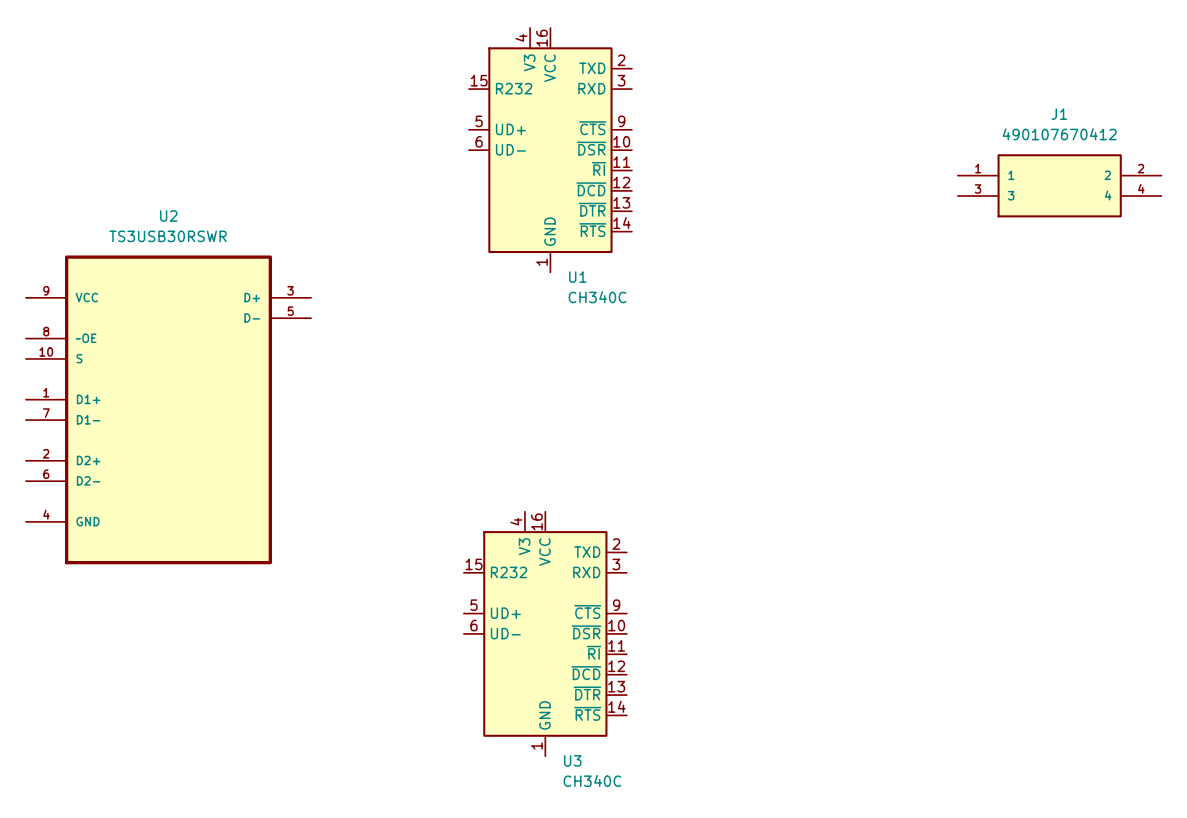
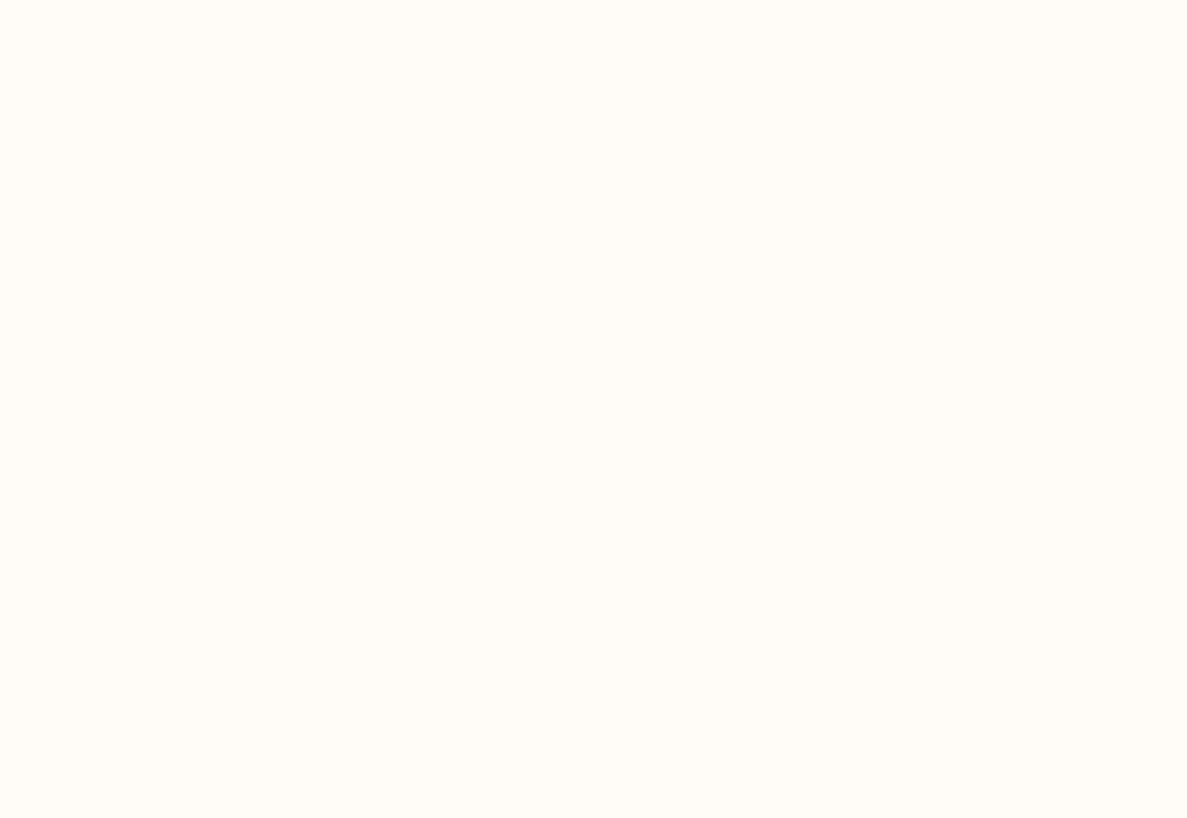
U1: CH340C (550, 150) -> none
J1: 490107670412 (1059, 185) -> none
U2: TS3USB30RSWR (168, 409) -> none
U3: CH340C (545, 633) -> none

